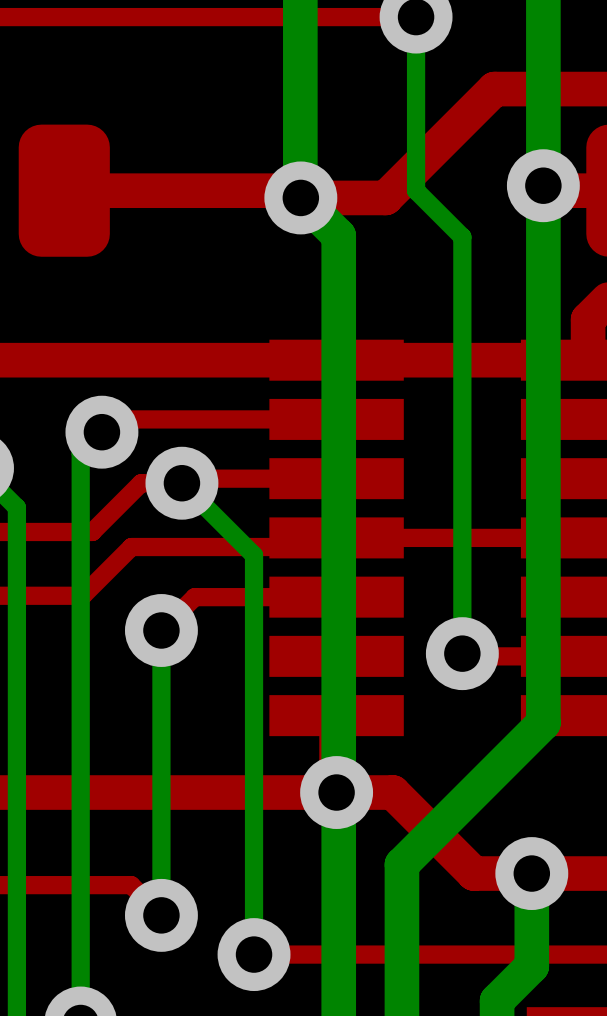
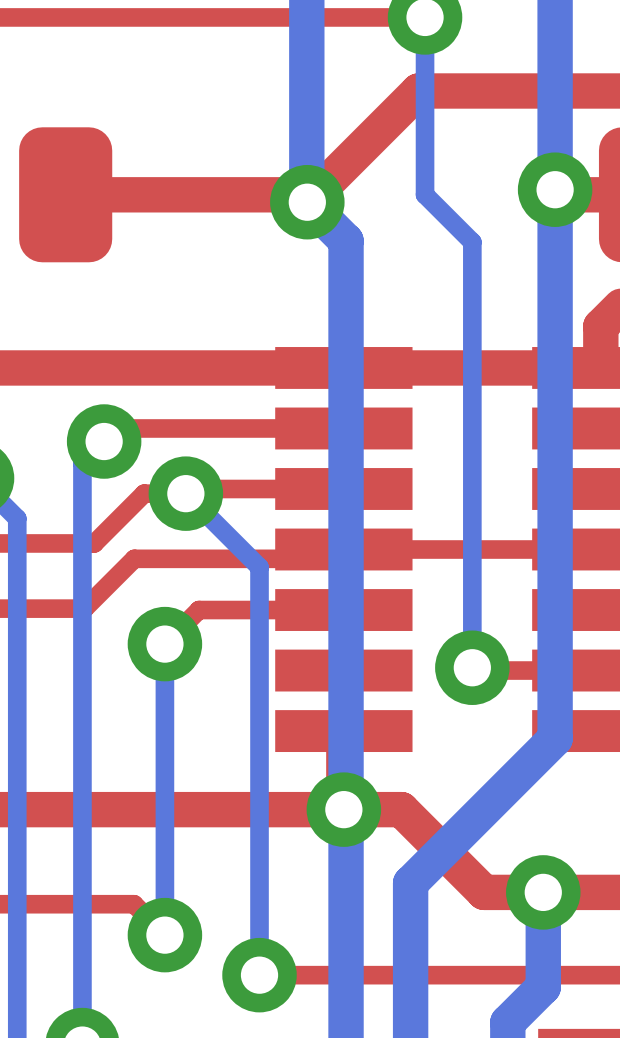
top track: (494, 89) (385, 197) (300, 197) -> (505, 90) (418, 90) (307, 202)

